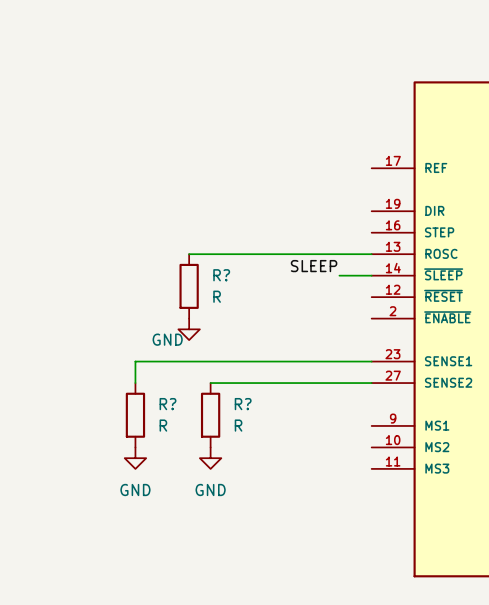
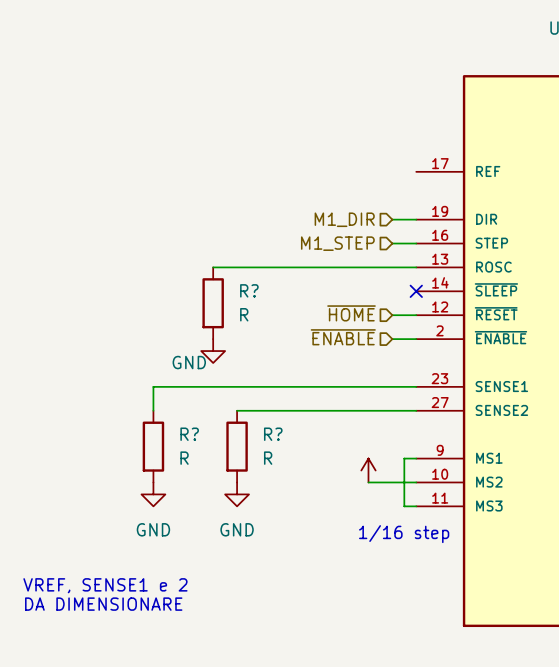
hierarchical label: none -> M1_DIR (344, 219)
wire: none -> (392, 219) (416, 219)
hierarchical label: none -> M1_STEP (337, 243)
wire: none -> (392, 243) (416, 243)
label: SLEEP (314, 266) -> none
wire: (339, 275) (371, 275) -> none
no-connect mark: none -> (416, 291)
hierarchical label: none -> ~{HOME} (351, 313)
wire: none -> (392, 315) (416, 315)
hierarchical label: none -> ~{ENABLE} (343, 337)
wire: none -> (392, 339) (416, 339)
wire: none -> (416, 458) (404, 458) (404, 506) (416, 506)
power symbol: none -> (368, 470)
wire: none -> (368, 482) (416, 482)
text: none -> 1/16 step (404, 534)
text: none -> VREF, SENSE1 e 2 (105, 585)
text: none -> DA DIMENSIONARE (103, 604)

